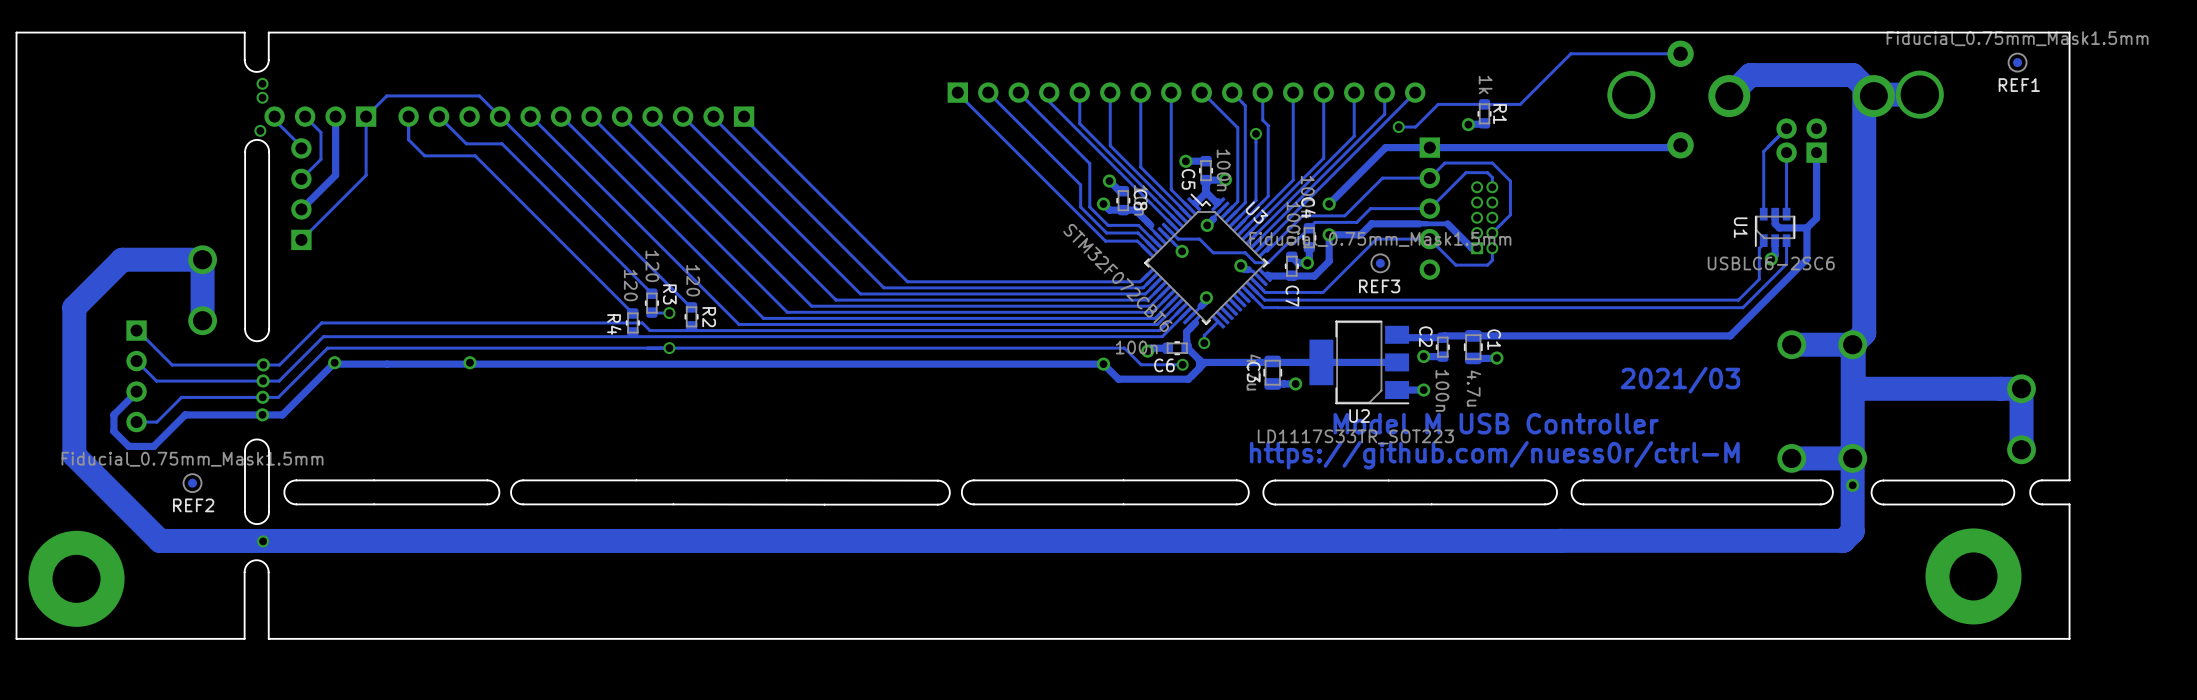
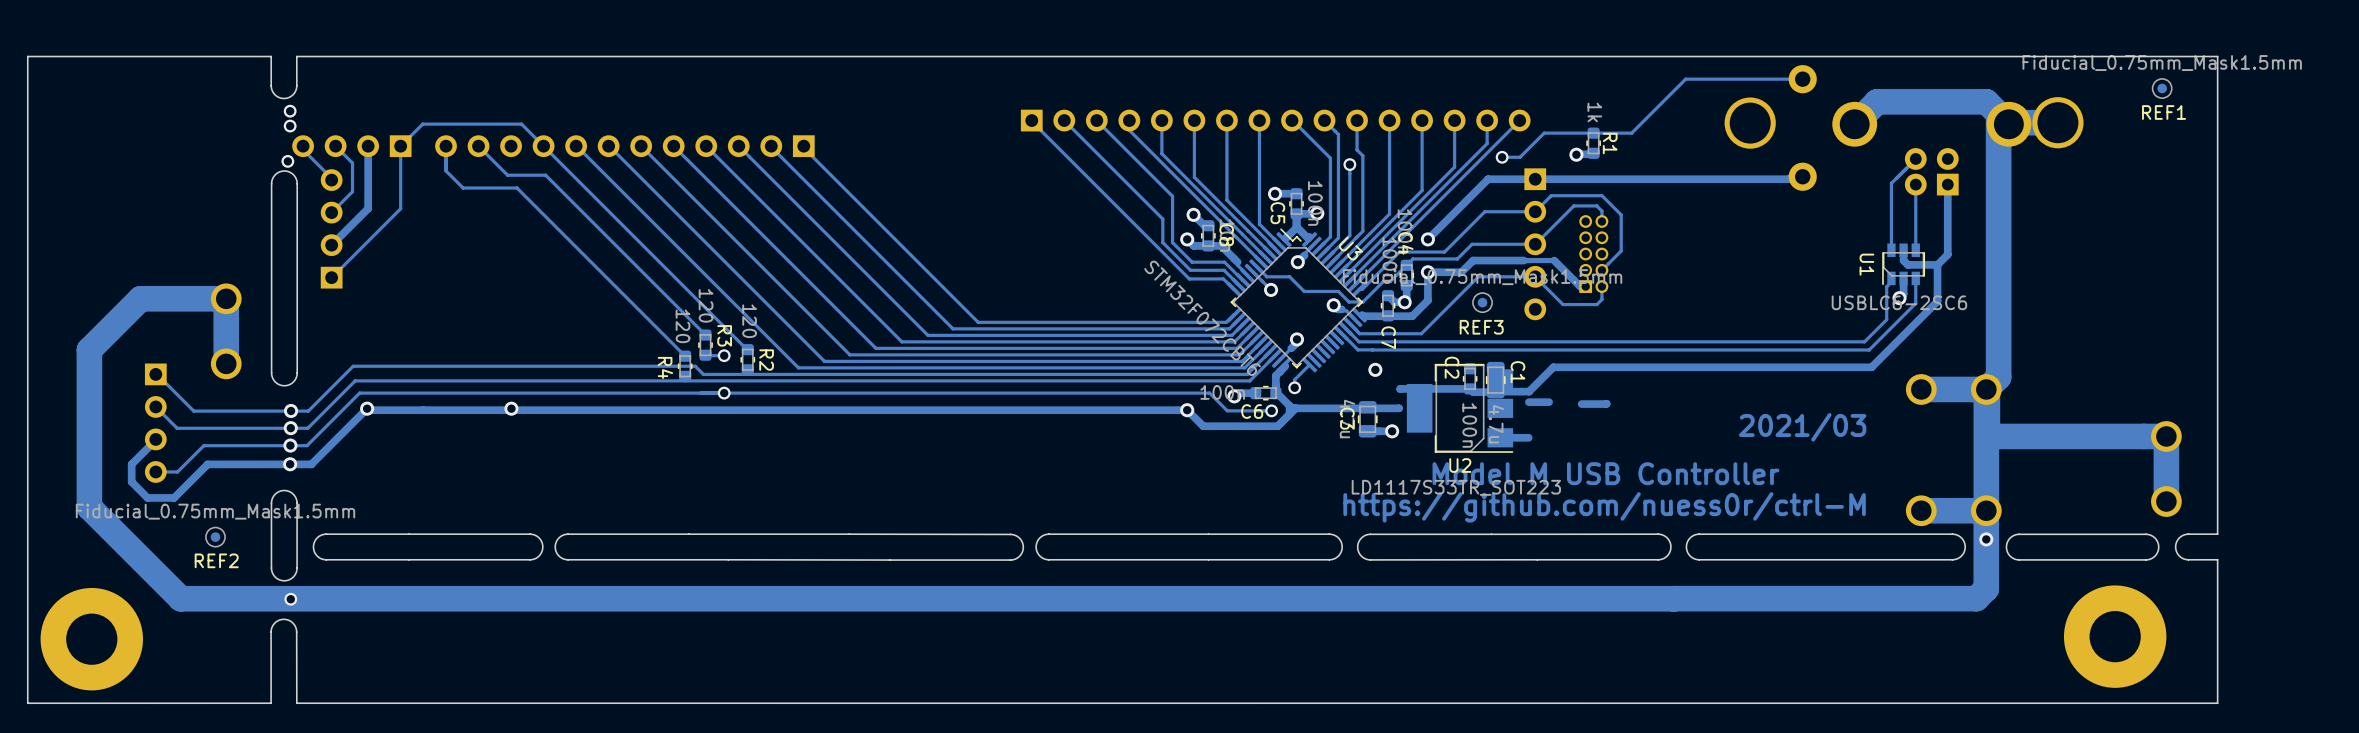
track: (1806, 259) (1730, 335) (1444, 335) (1442, 337) (1399, 337) (1397, 334) -> (1937, 298) (1937, 301) (1871, 367) (1553, 367) (1529, 391) (1473, 392) (1470, 388) (1400, 388)
via: none -> (1375, 369)
C2 position: (1442, 347) -> (1470, 378)
C1 position: (1473, 347) -> (1495, 380)
via: (1423, 356) -> none
via: (1496, 358) -> none
track: (1397, 362) (1302, 362) -> none
via: (1423, 390) -> none

